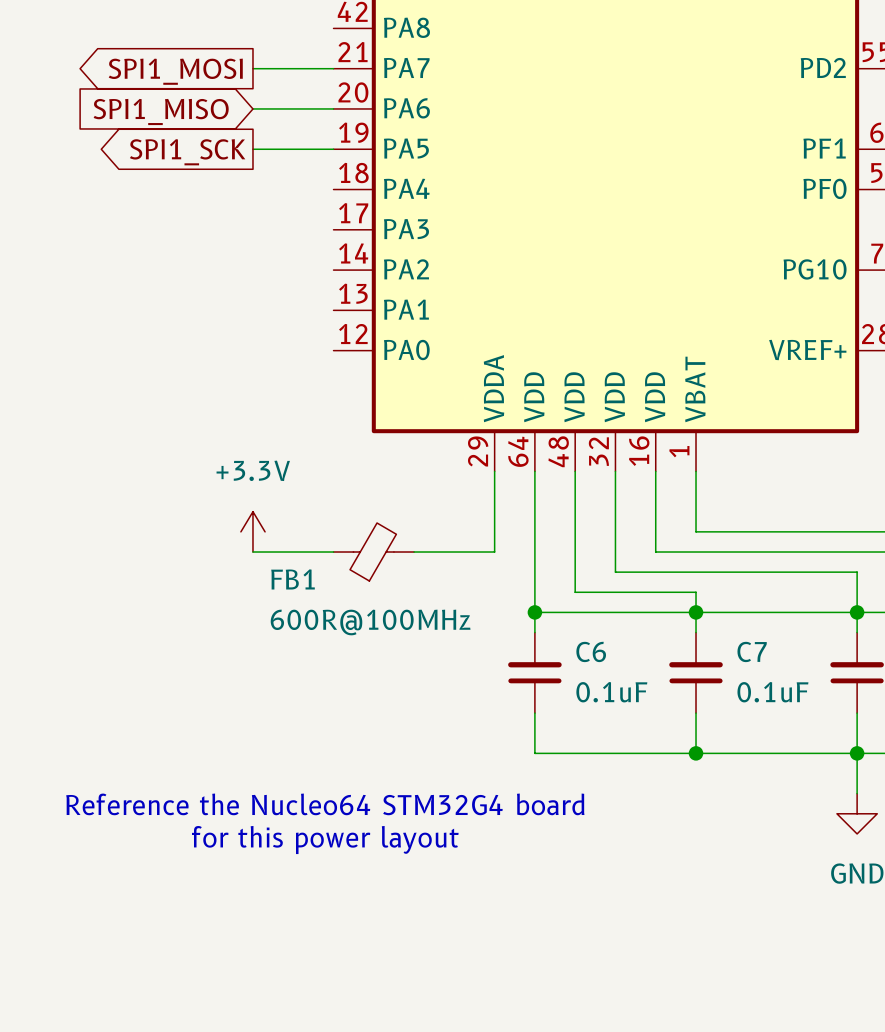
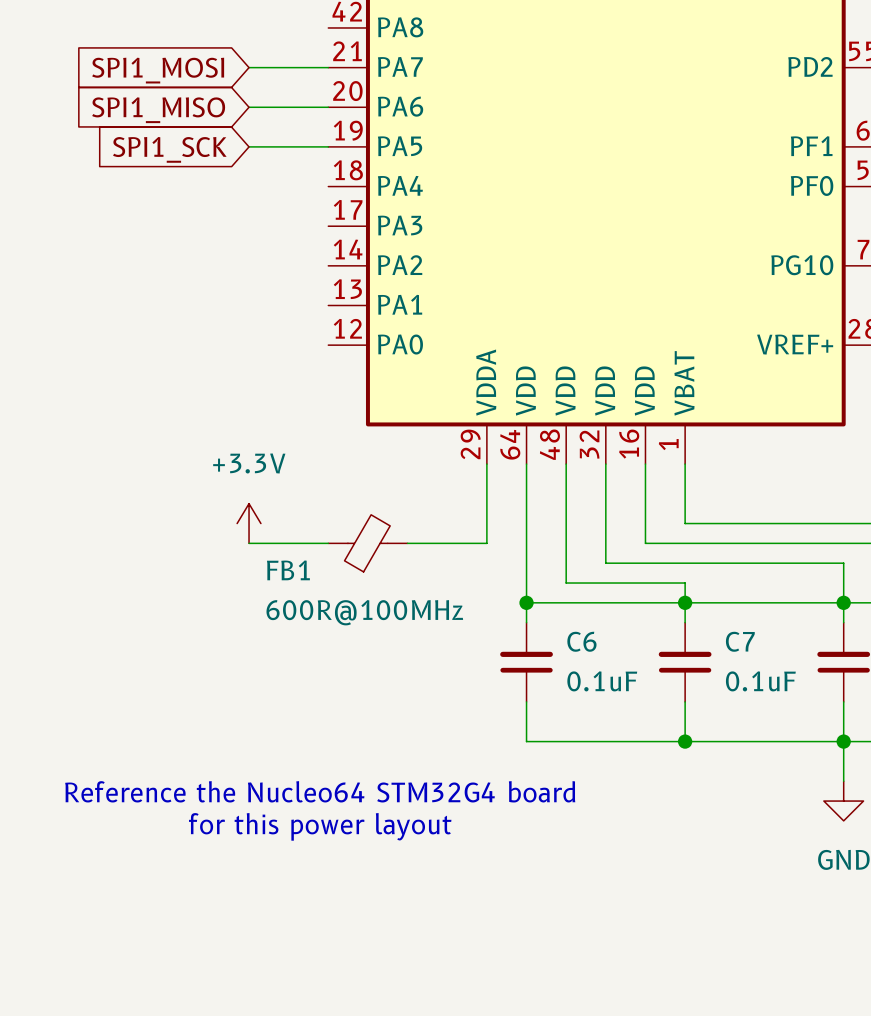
global label shape: output (175, 71) -> input (158, 70)
global label shape: output (187, 152) -> input (169, 149)

